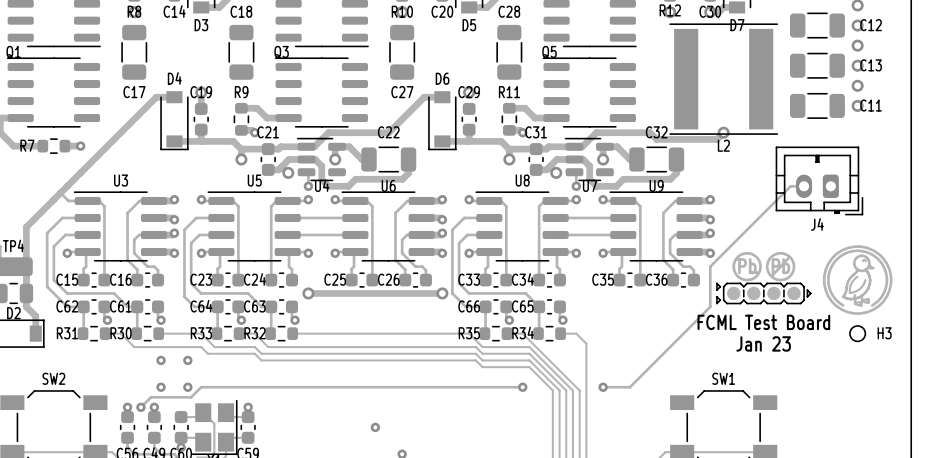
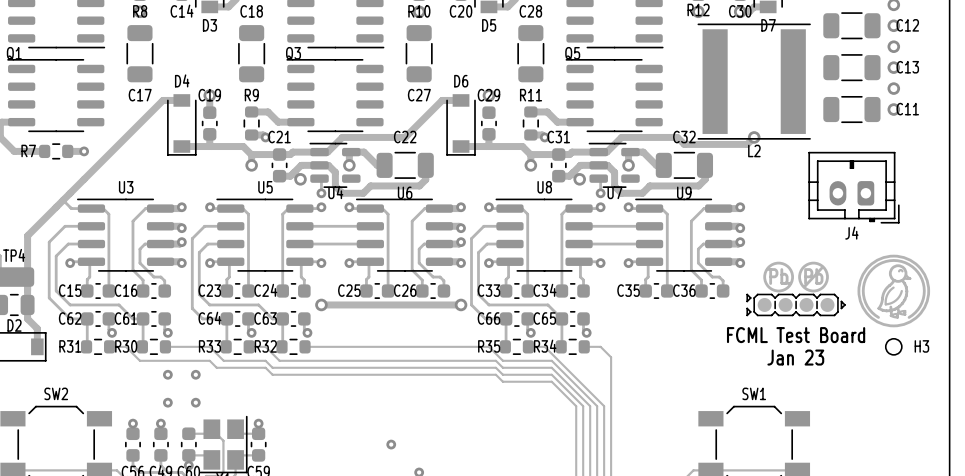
track: (804, 186) (790, 186) (710, 266) (710, 306) (629, 387) (603, 387) -> none
track: (522, 387) (201, 387) (191, 397) (151, 397) (140, 407) -> none
via: (522, 387) -> none
via: (603, 387) -> none
via: (140, 407) -> none

